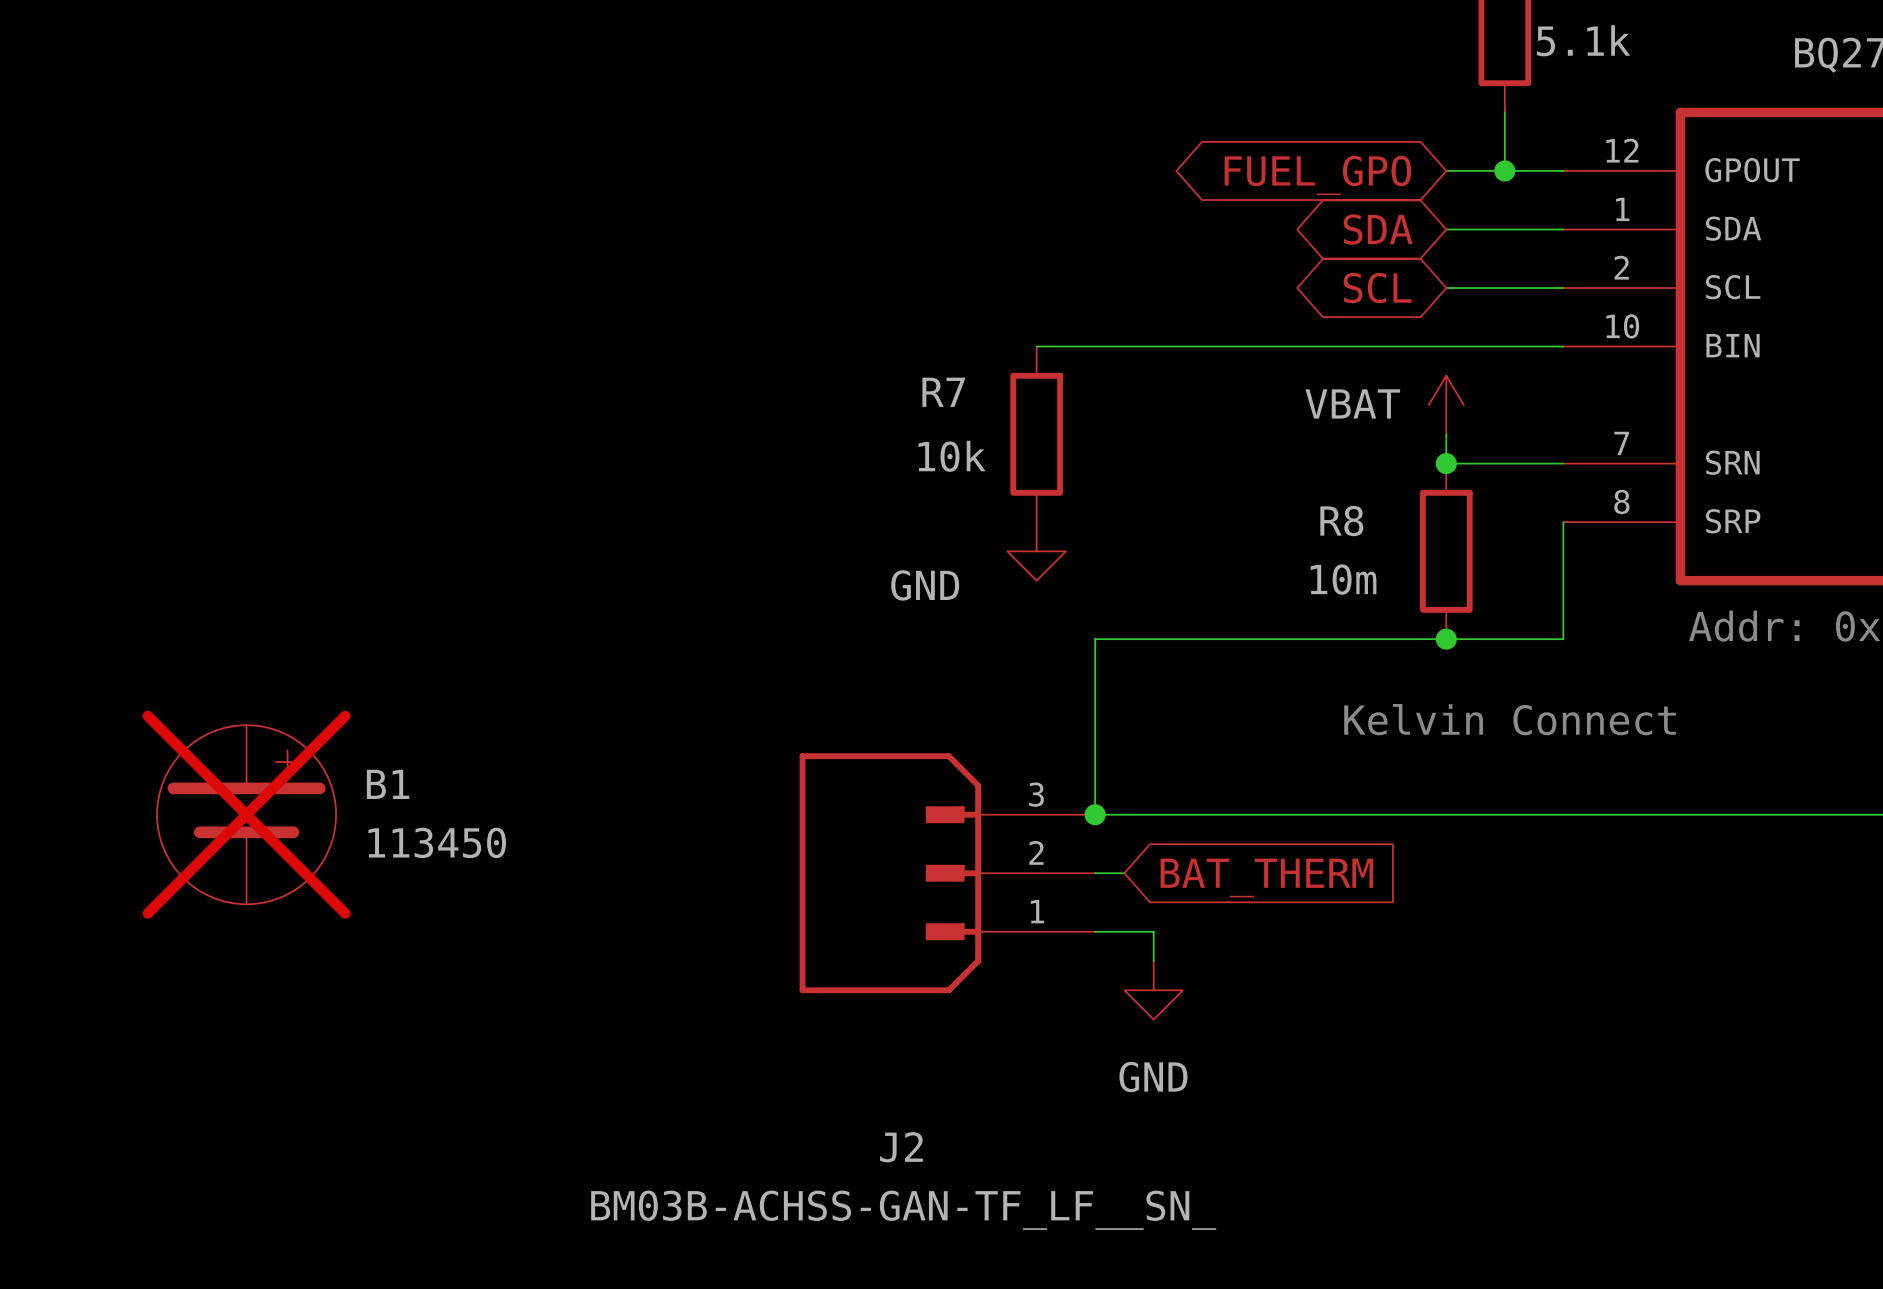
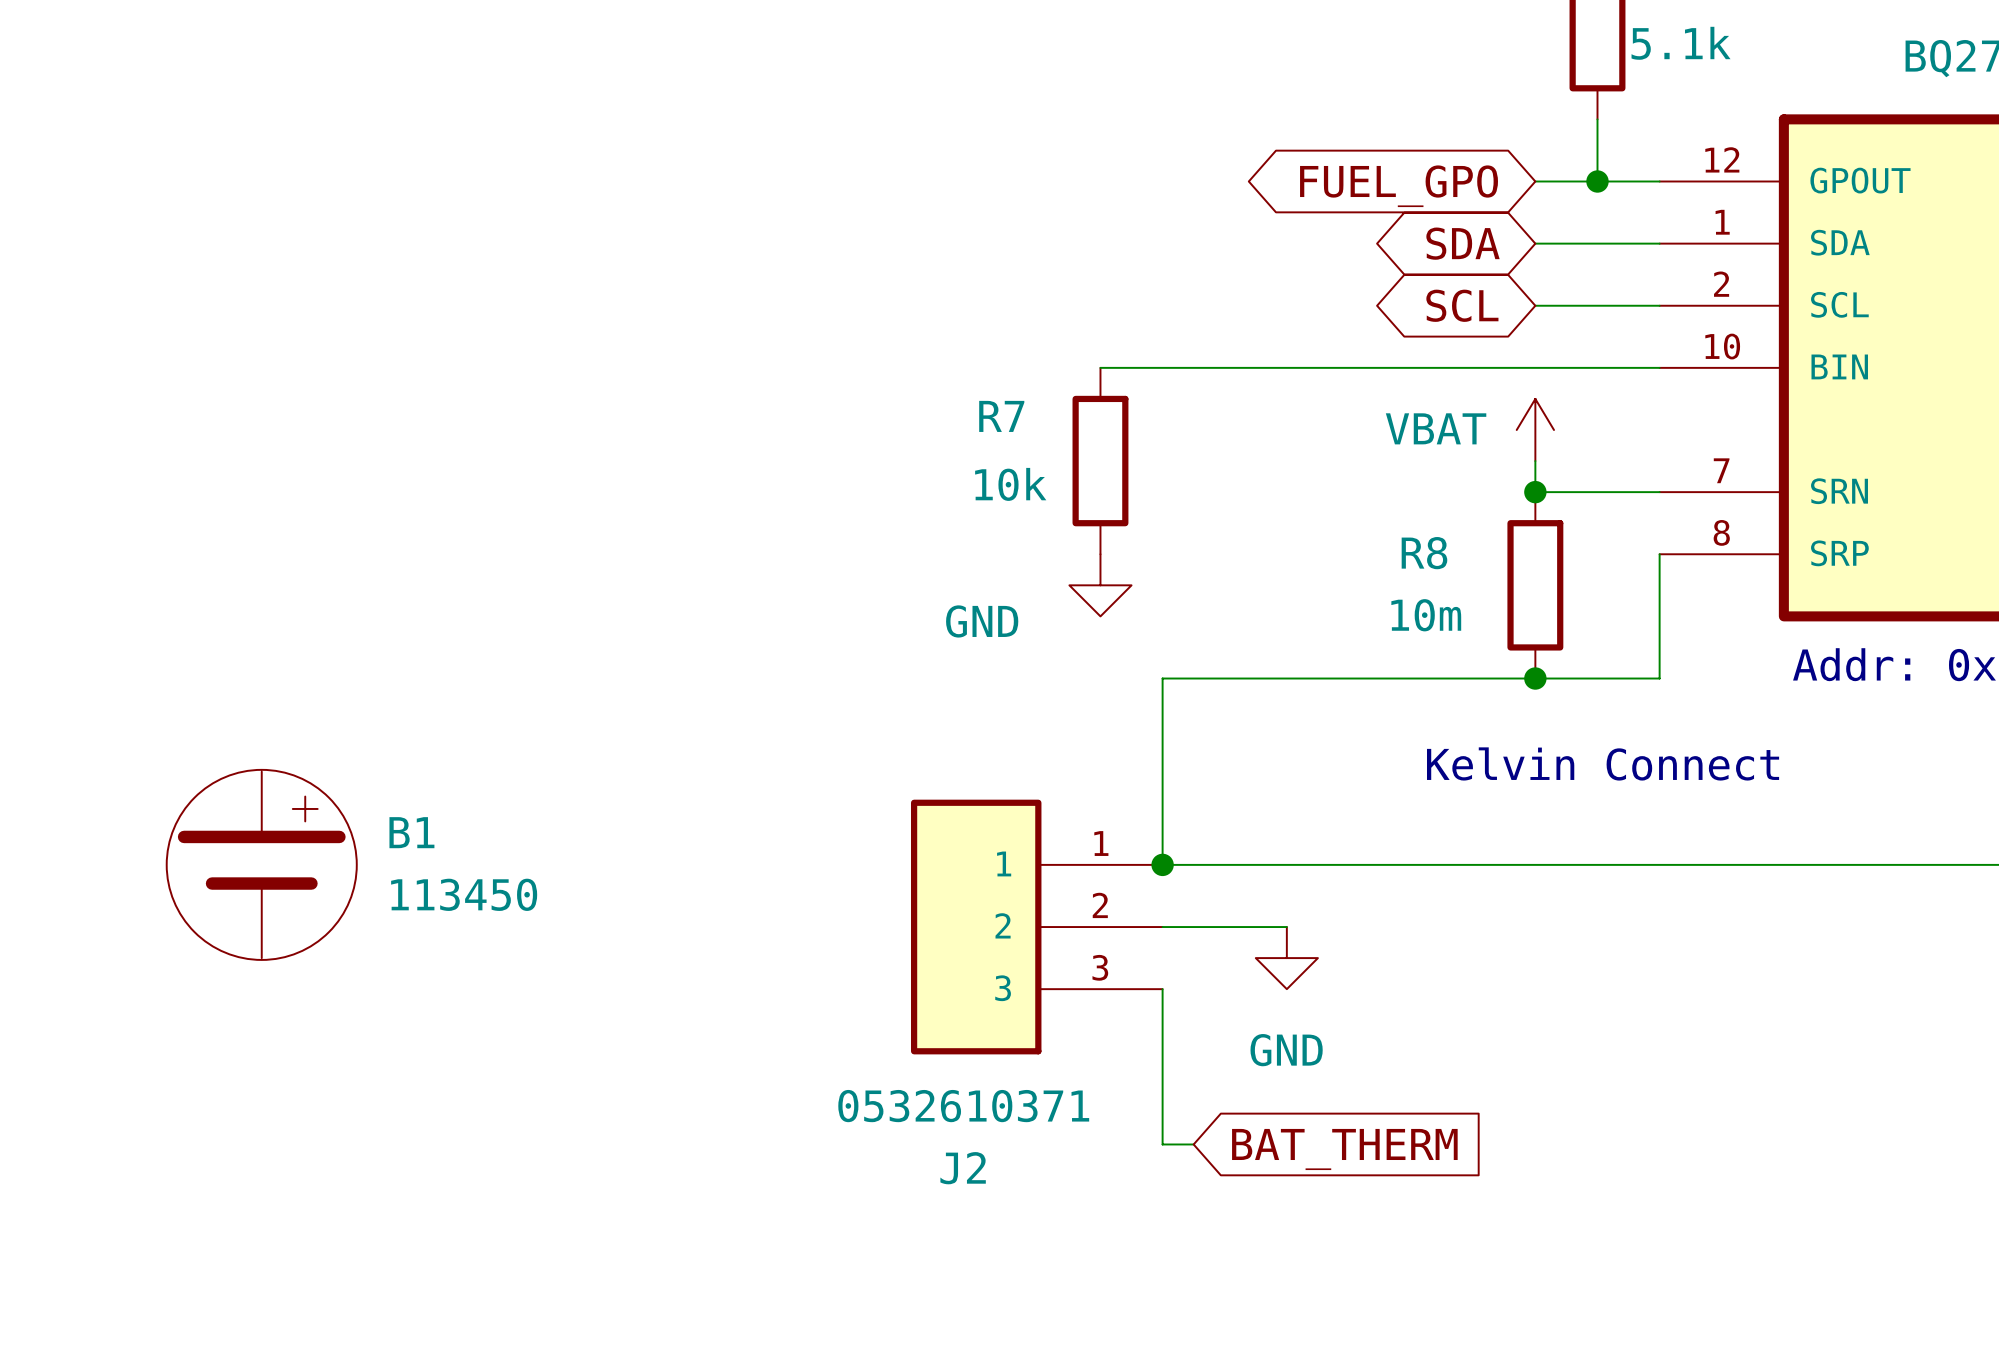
J2 symbol: [799, 753, 1096, 994] -> [910, 799, 1163, 1055]
B1 do-not-place cross: (246, 814) -> none
wire: none -> (1193, 927) (1286, 927)
global label position: BAT_THERM (1266, 877) -> BAT_THERM (1344, 1149)
wire: (1095, 931) (1153, 931) (1153, 961) -> (1162, 989) (1162, 1144) (1193, 1144)
power symbol position: GND (1153, 990) -> GND (1286, 958)
J2 name position: J2 (901, 1147) -> J2 (963, 1168)
J2 value: BM03B-ACHSS-GAN-TF_LF__SN_ (903, 1210) -> 0532610371 (963, 1106)

